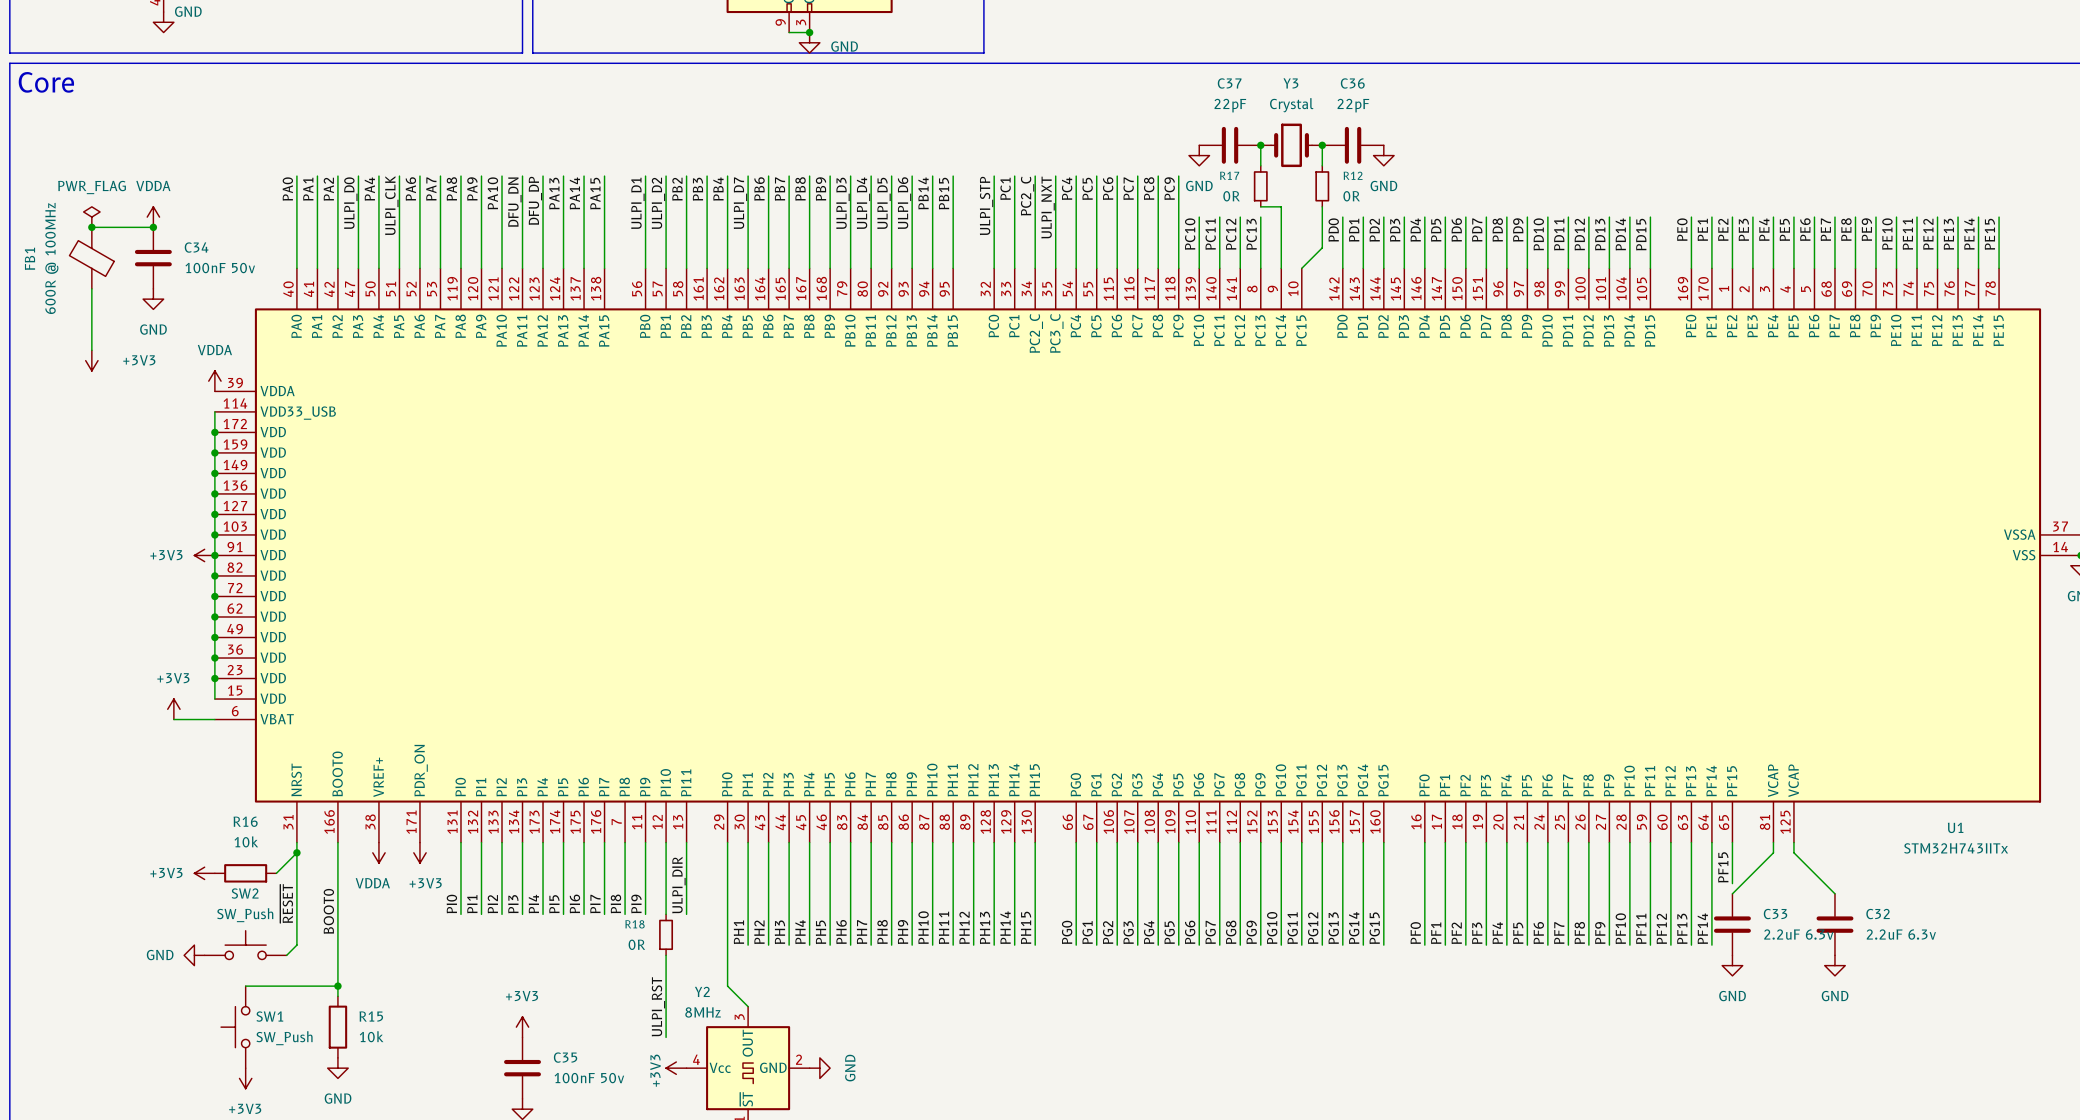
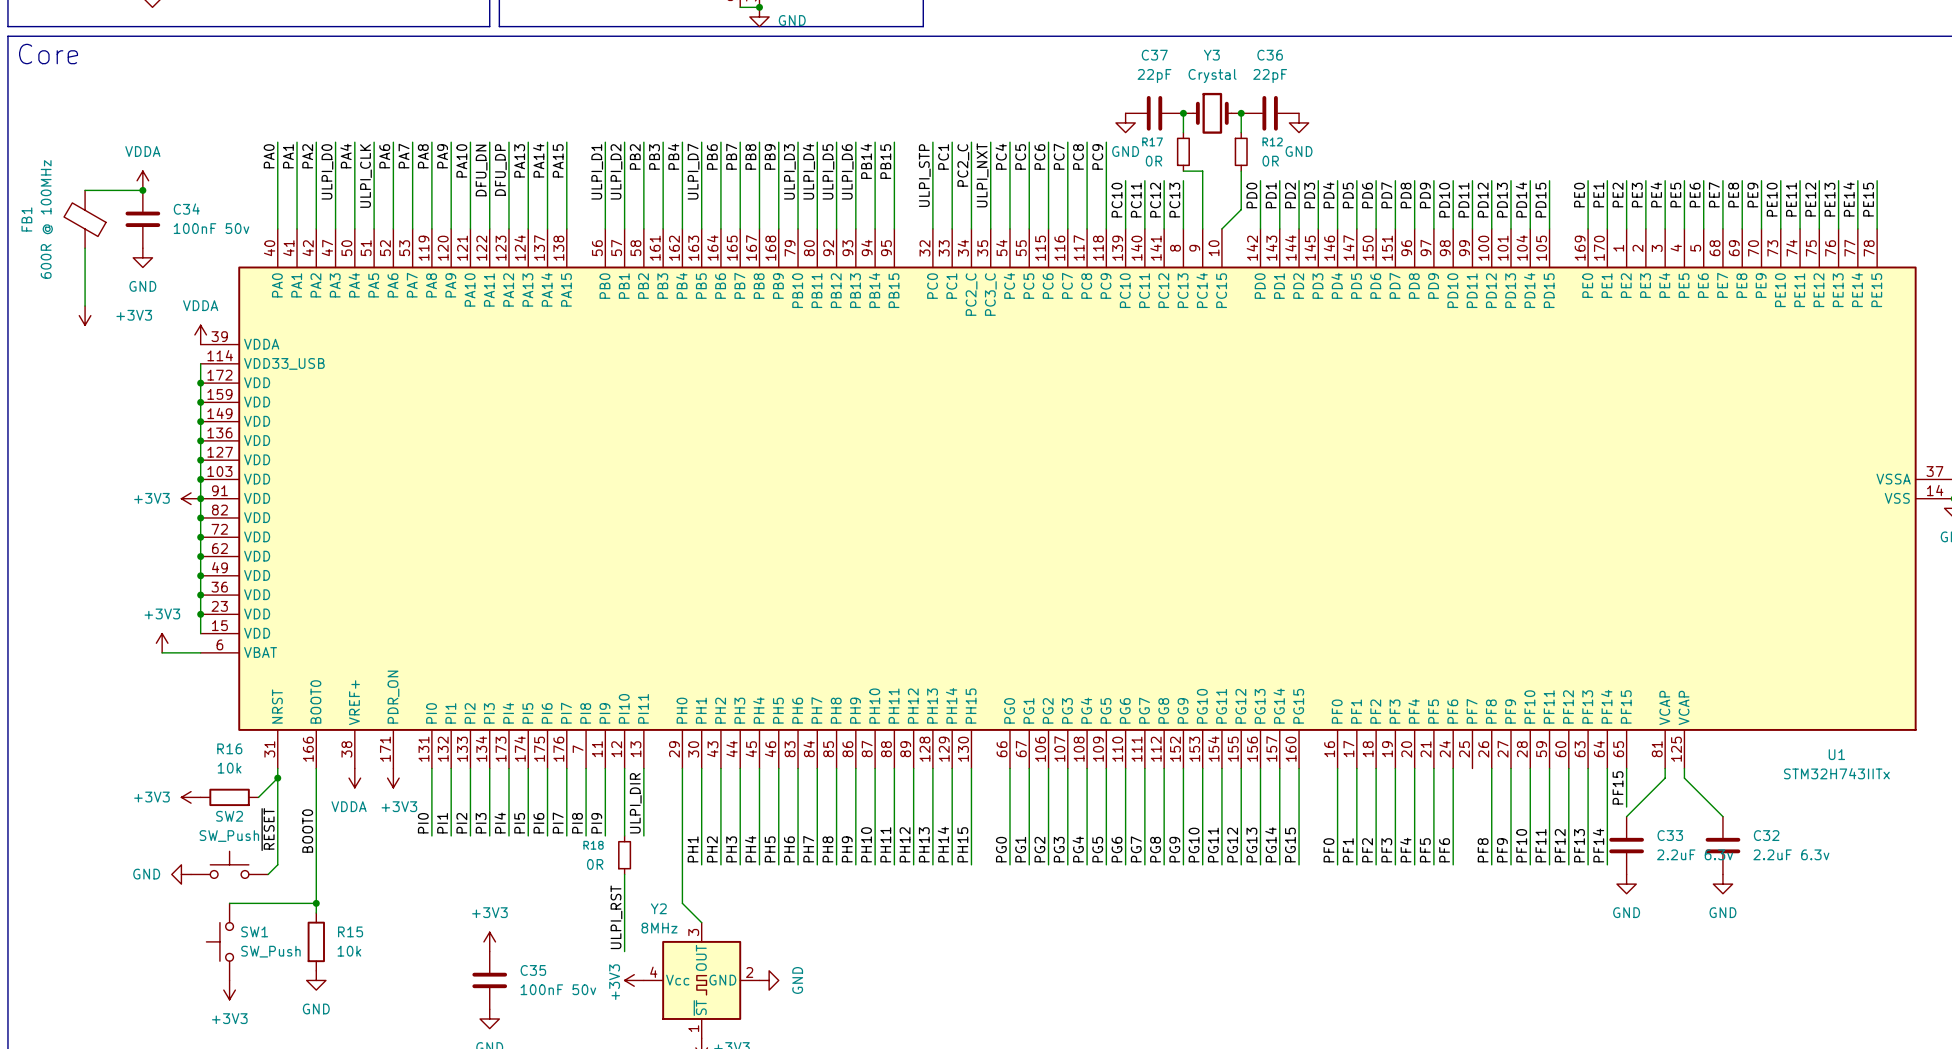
power symbol: PWR_FLAG (91, 217) -> none
junction: (91, 227) -> none
wire: (1568, 842) (1568, 945) -> none
label: PF7 (1559, 933) -> none

